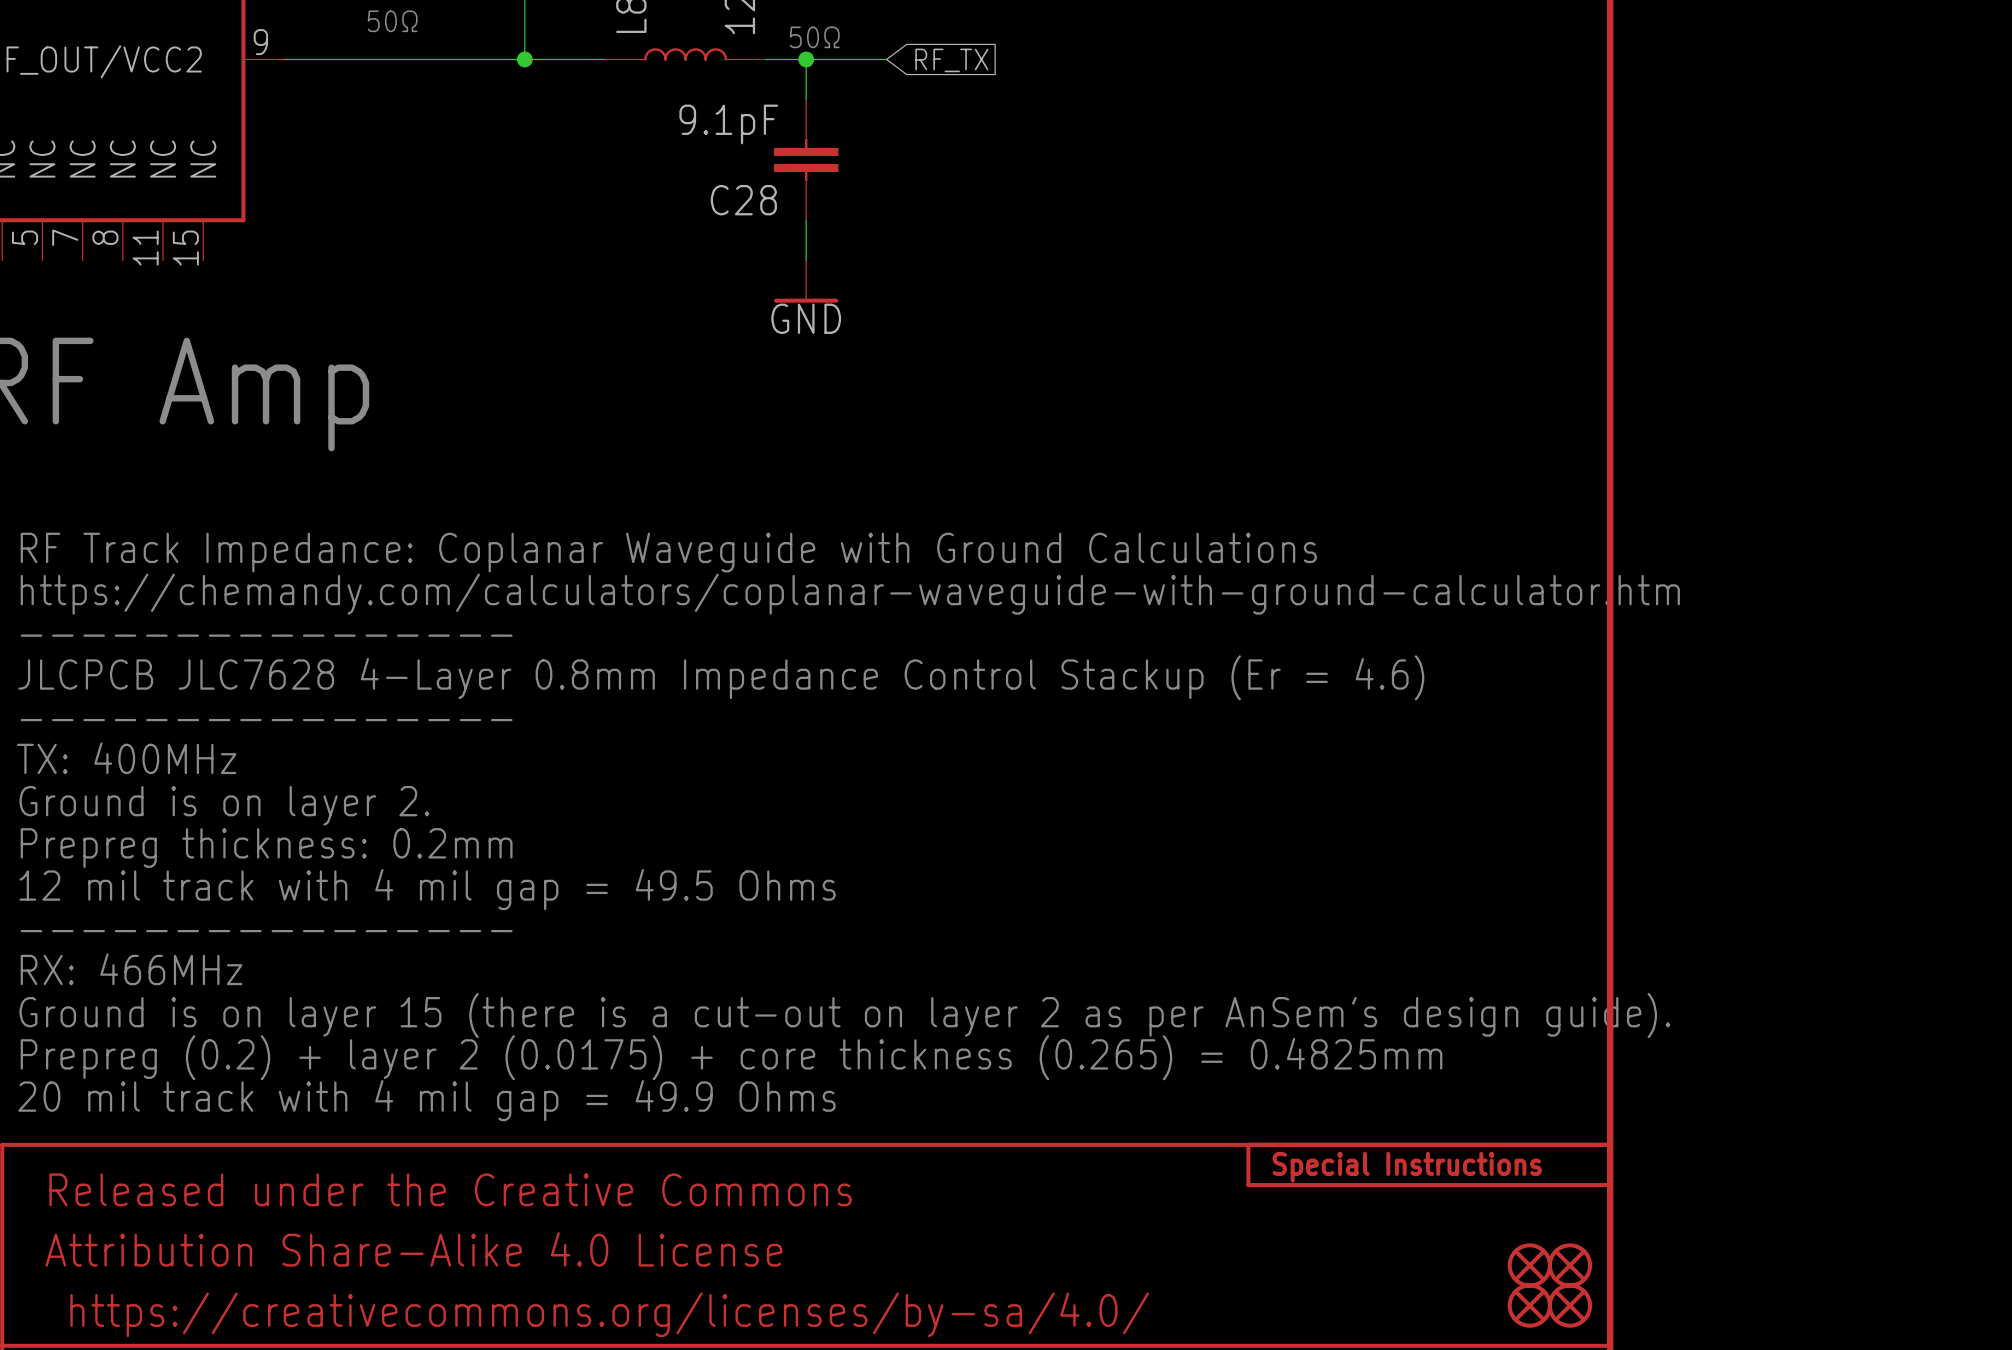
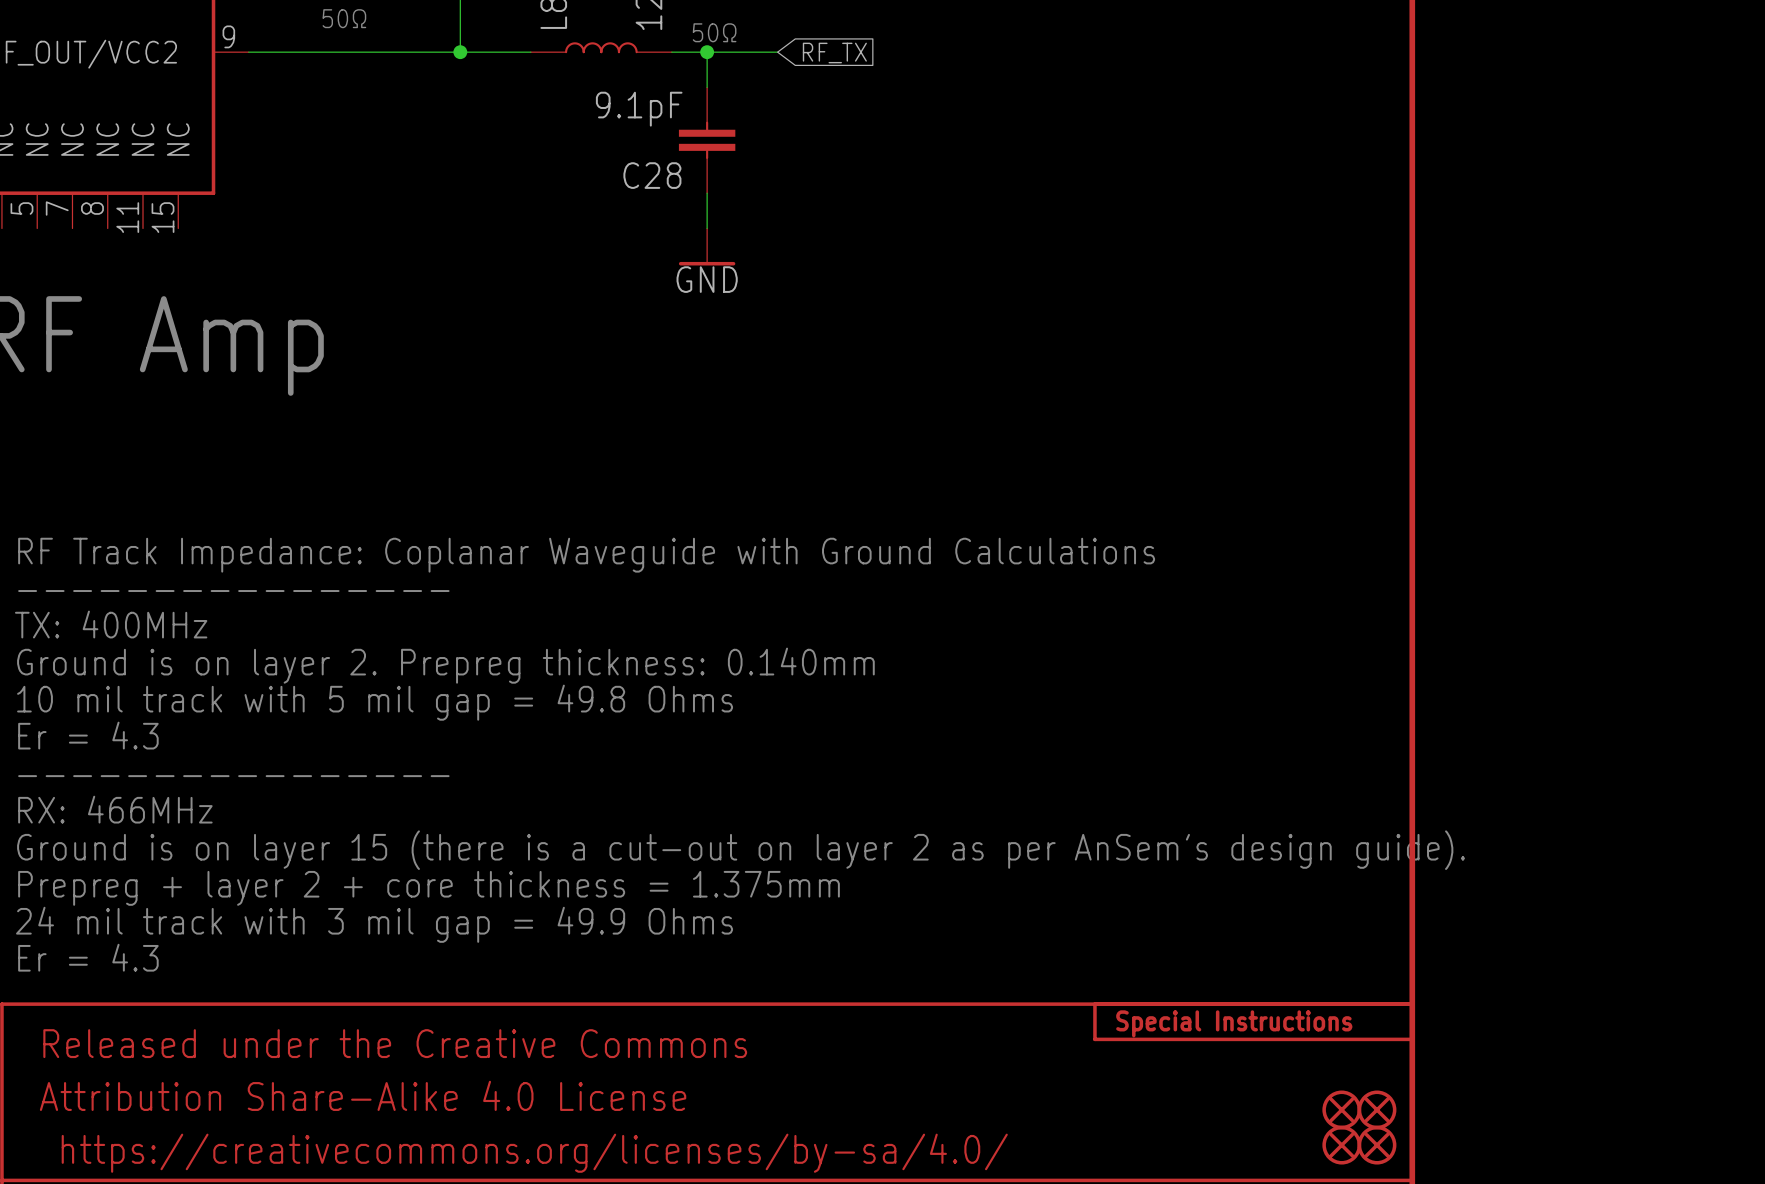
text position: RF Track Impedance: Coplanar Waveguide with Ground Calculations (668, 552) -> RF Track Impedance: Coplanar Waveguide with Ground Calculations (586, 555)
text: https://chemandy.com/calculators/coplanar-waveguide-with-ground-calculator.htm (850, 594) -> none
text: ---------------- (266, 635) -> none
text: JLCPCB JLC7628 4-Layer 0.8mm Impedance Control Stackup (Er = 4.6) (721, 677) -> ---------------- (233, 591)
text: ---------------- (266, 720) -> none
text position: TX: 400MHz (126, 758) -> TX: 400MHz (111, 624)
text: none -> Ground is on layer 2. Prepreg thickness: 0.140mm (445, 665)
text: Ground is on layer 2. (224, 805) -> 10 mil track with 5 mil gap = 49.8 Ohms (375, 702)
text: Prepreg thickness: 0.2mm (266, 848) -> Er = 4.3 (88, 735)
text: 12 mil track with 4 mil gap = 49.5 Ohms (427, 889) -> none
text position: ---------------- (266, 931) -> ---------------- (233, 776)
text position: RX: 466MHz (131, 969) -> RX: 466MHz (115, 809)
text: none -> Prepreg + layer 2 + core thickness = 1.375mm (429, 888)
text position: Ground is on layer 15 (there is a cut-out on layer 2 as per AnSem's design guide). (844, 1015) -> Ground is on layer 15 (there is a cut-out on layer 2 as per AnSem's design guide). (741, 850)
text: Prepreg (0.2) + layer 2 (0.0175) + core thickness (0.265) = 0.4825mm (731, 1057) -> 24 mil track with 3 mil gap = 49.9 Ohms (374, 924)
text: 20 mil track with 4 mil gap = 49.9 Ohms (427, 1100) -> Er = 4.3 (88, 957)

